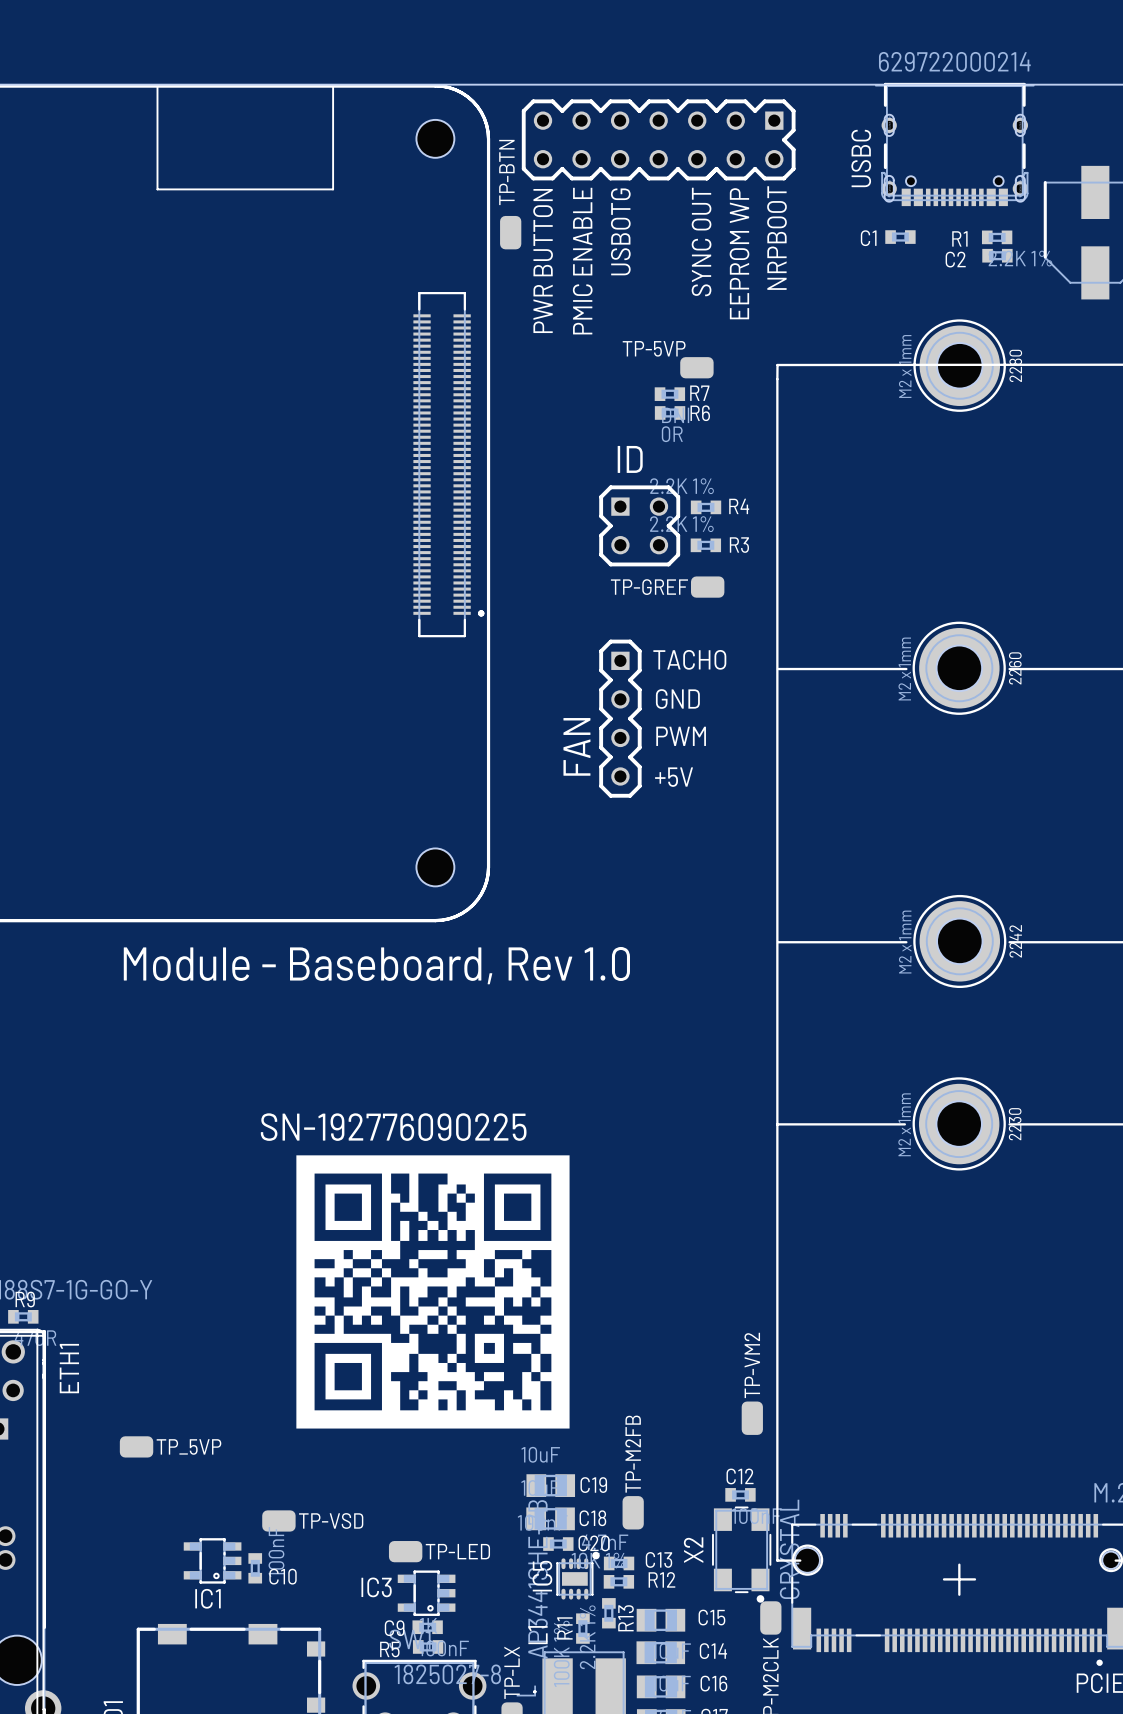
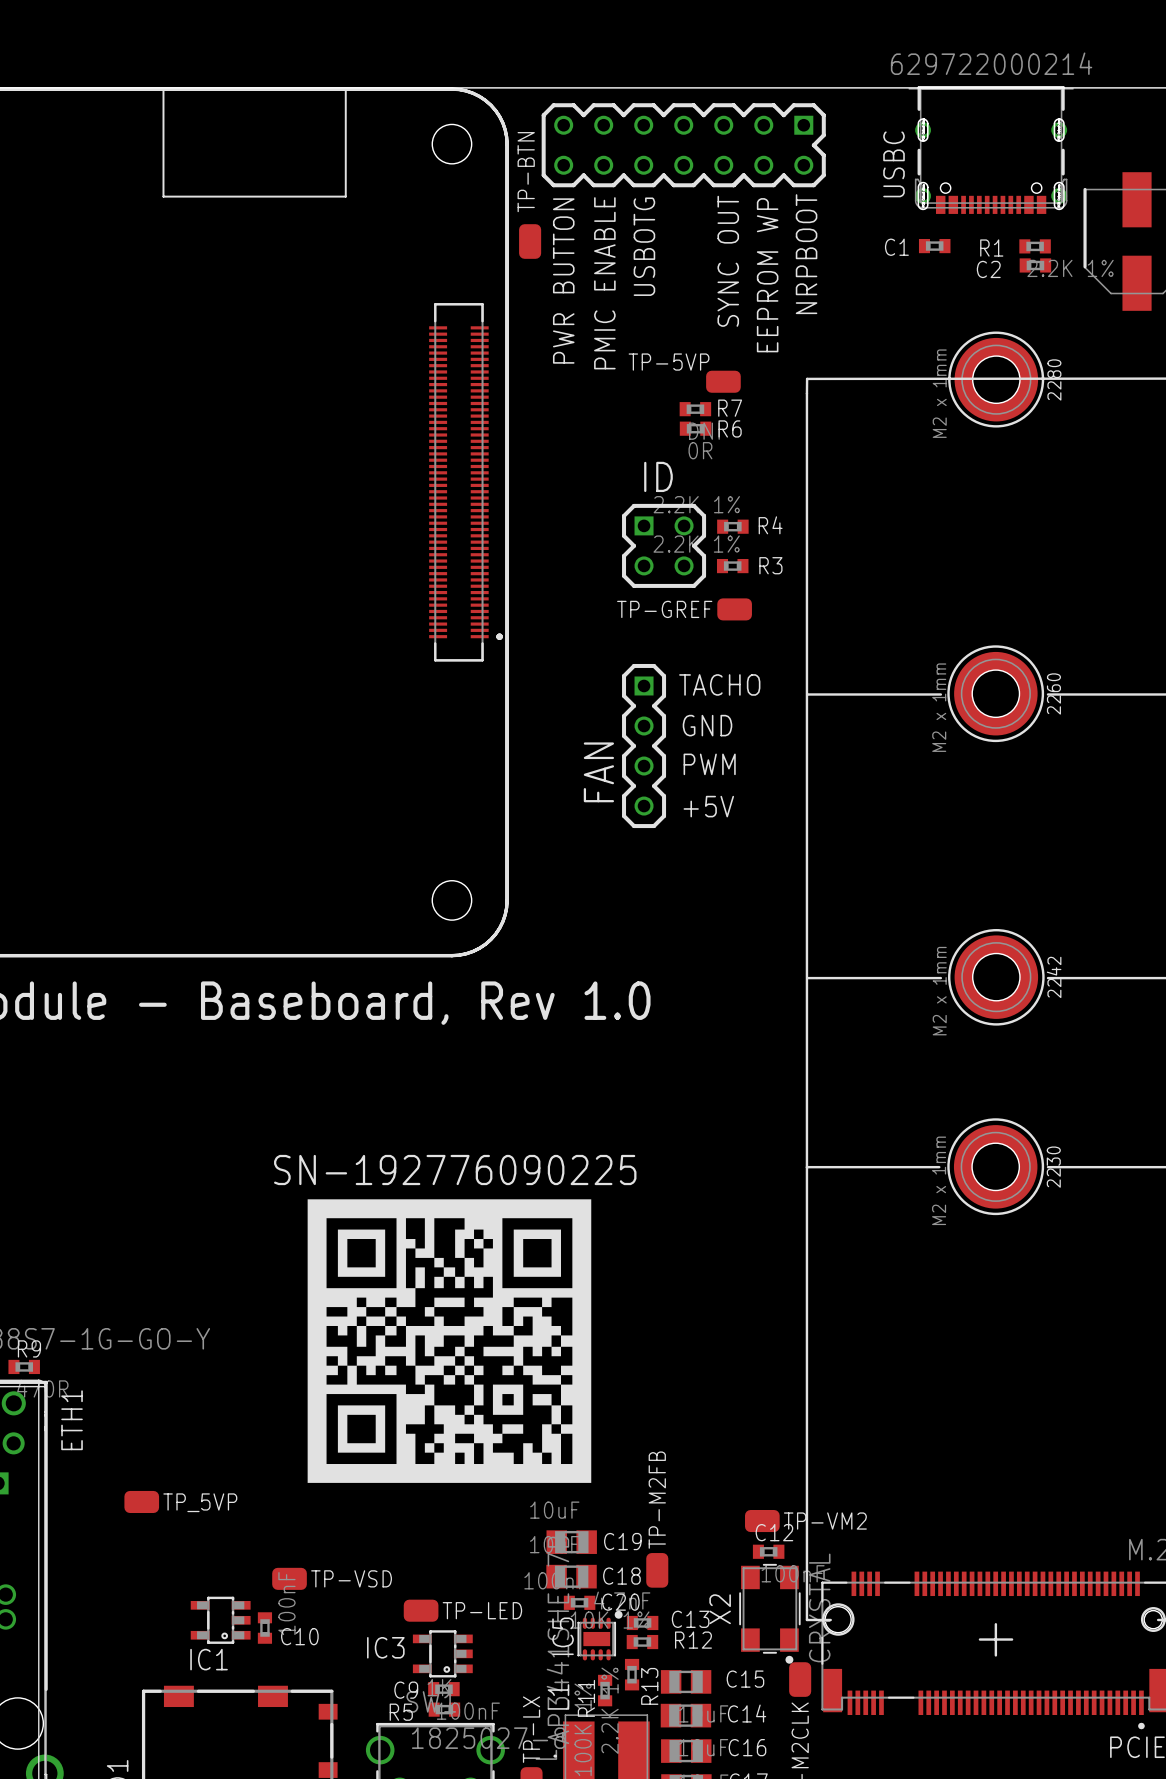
TP-VM2 rotation: 0° (752, 1418) -> 90° clockwise (762, 1521)
TP-VM2 position: (752, 1418) -> (762, 1521)

